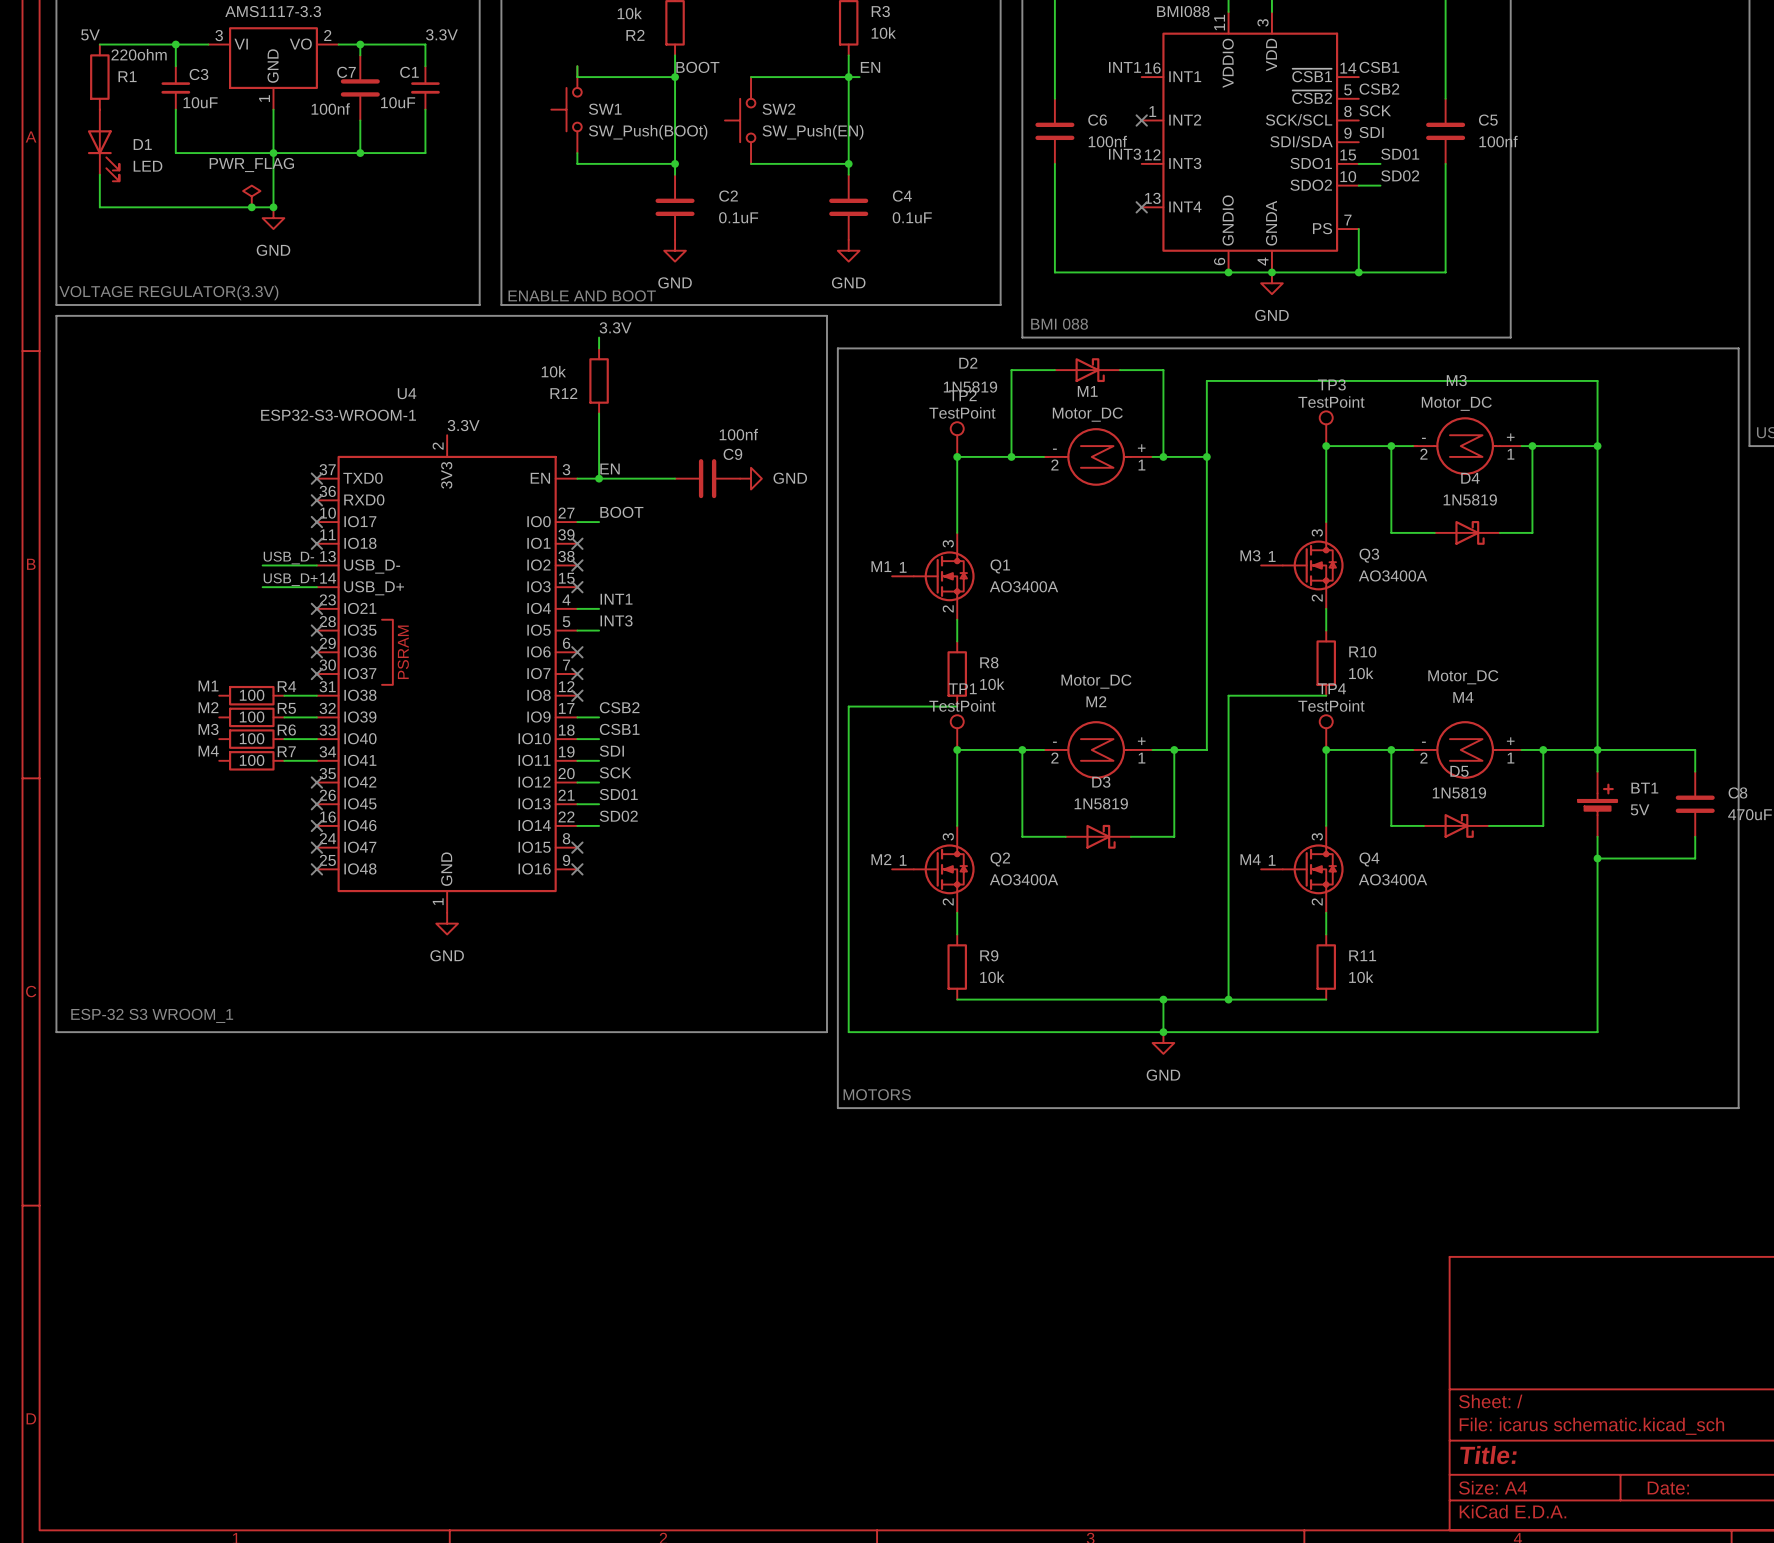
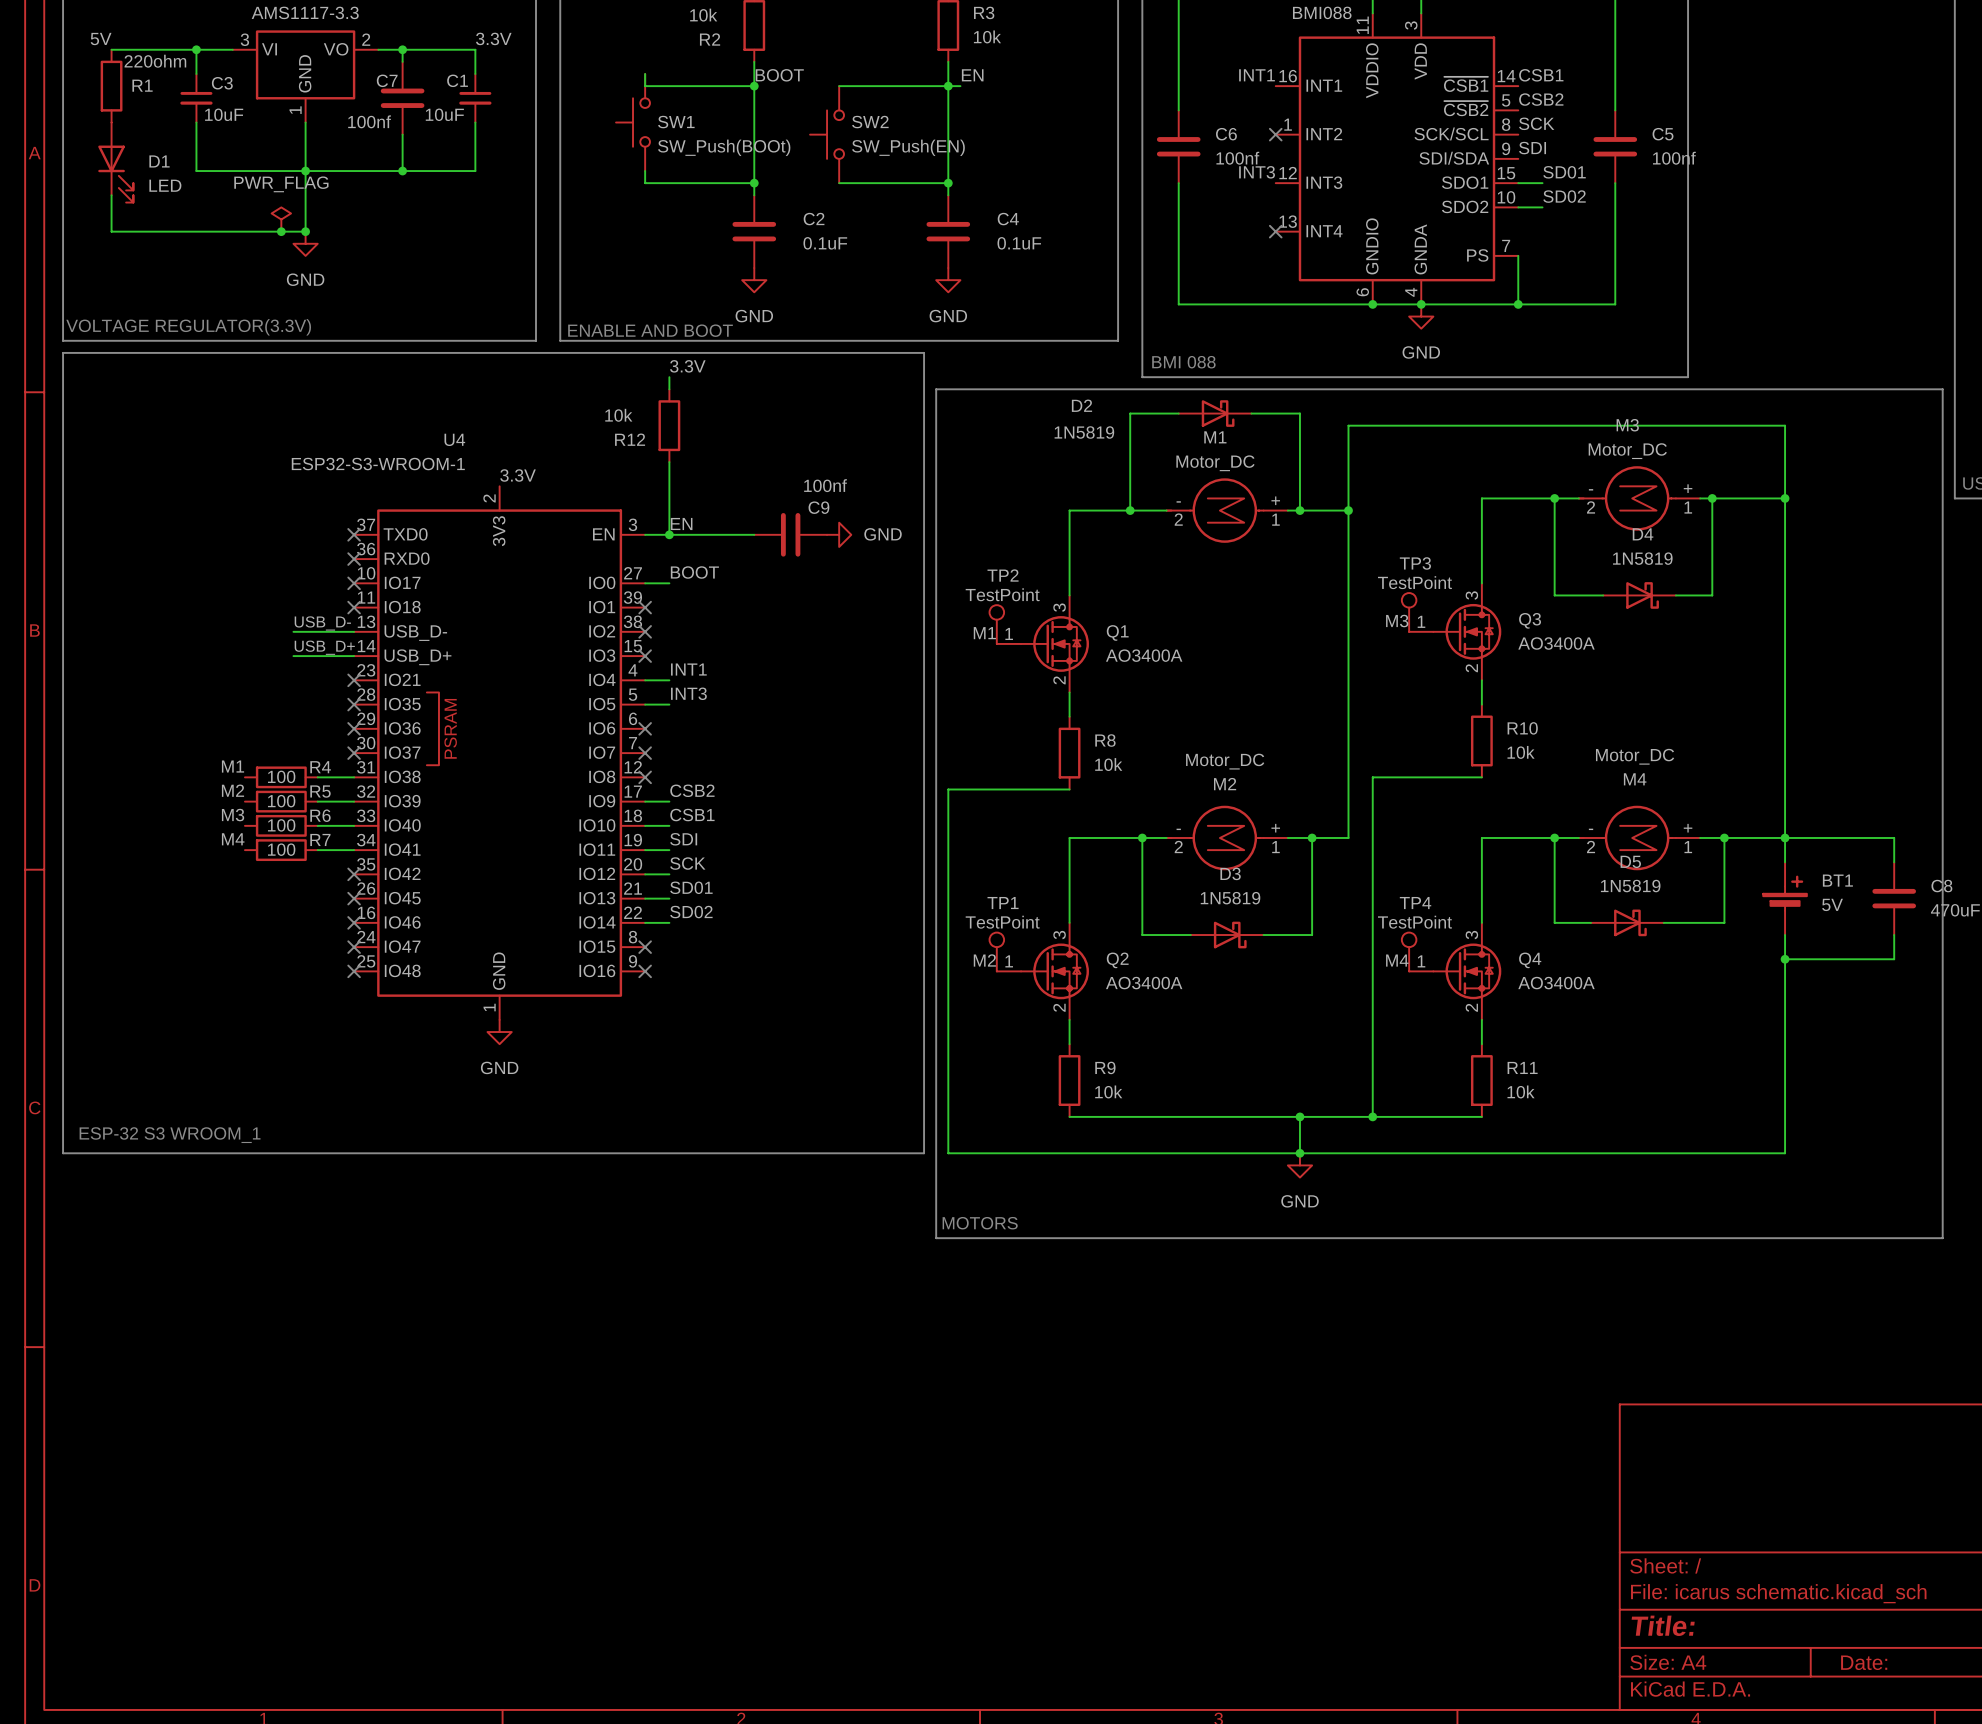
TP3 position: (1326, 428) -> (1409, 612)
TP2 position: (957, 439) -> (996, 624)
junction: (1326, 446) -> none
junction: (957, 456) -> none
TP1 position: (957, 732) -> (996, 951)
TP4 position: (1326, 732) -> (1409, 951)
junction: (957, 749) -> none
junction: (1326, 749) -> none

